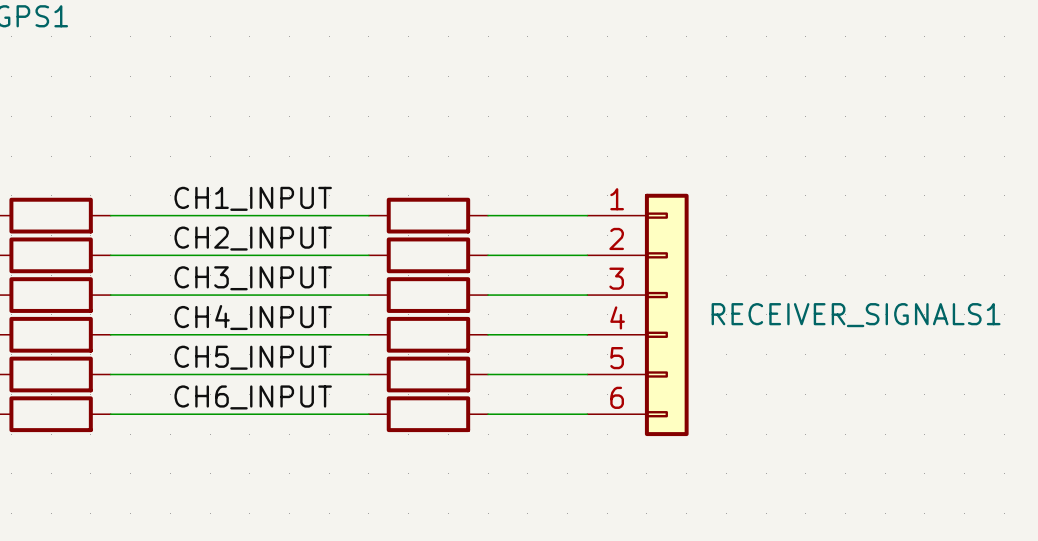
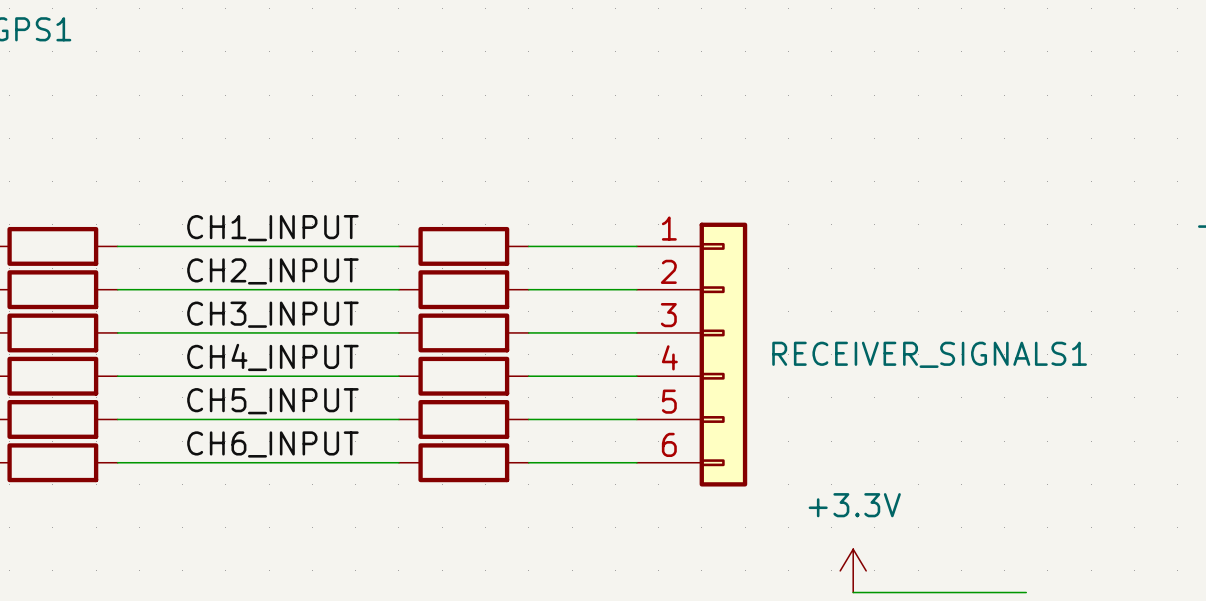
power symbol: none -> +3.3V (853, 570)
wire: none -> (853, 592) (1026, 592)

